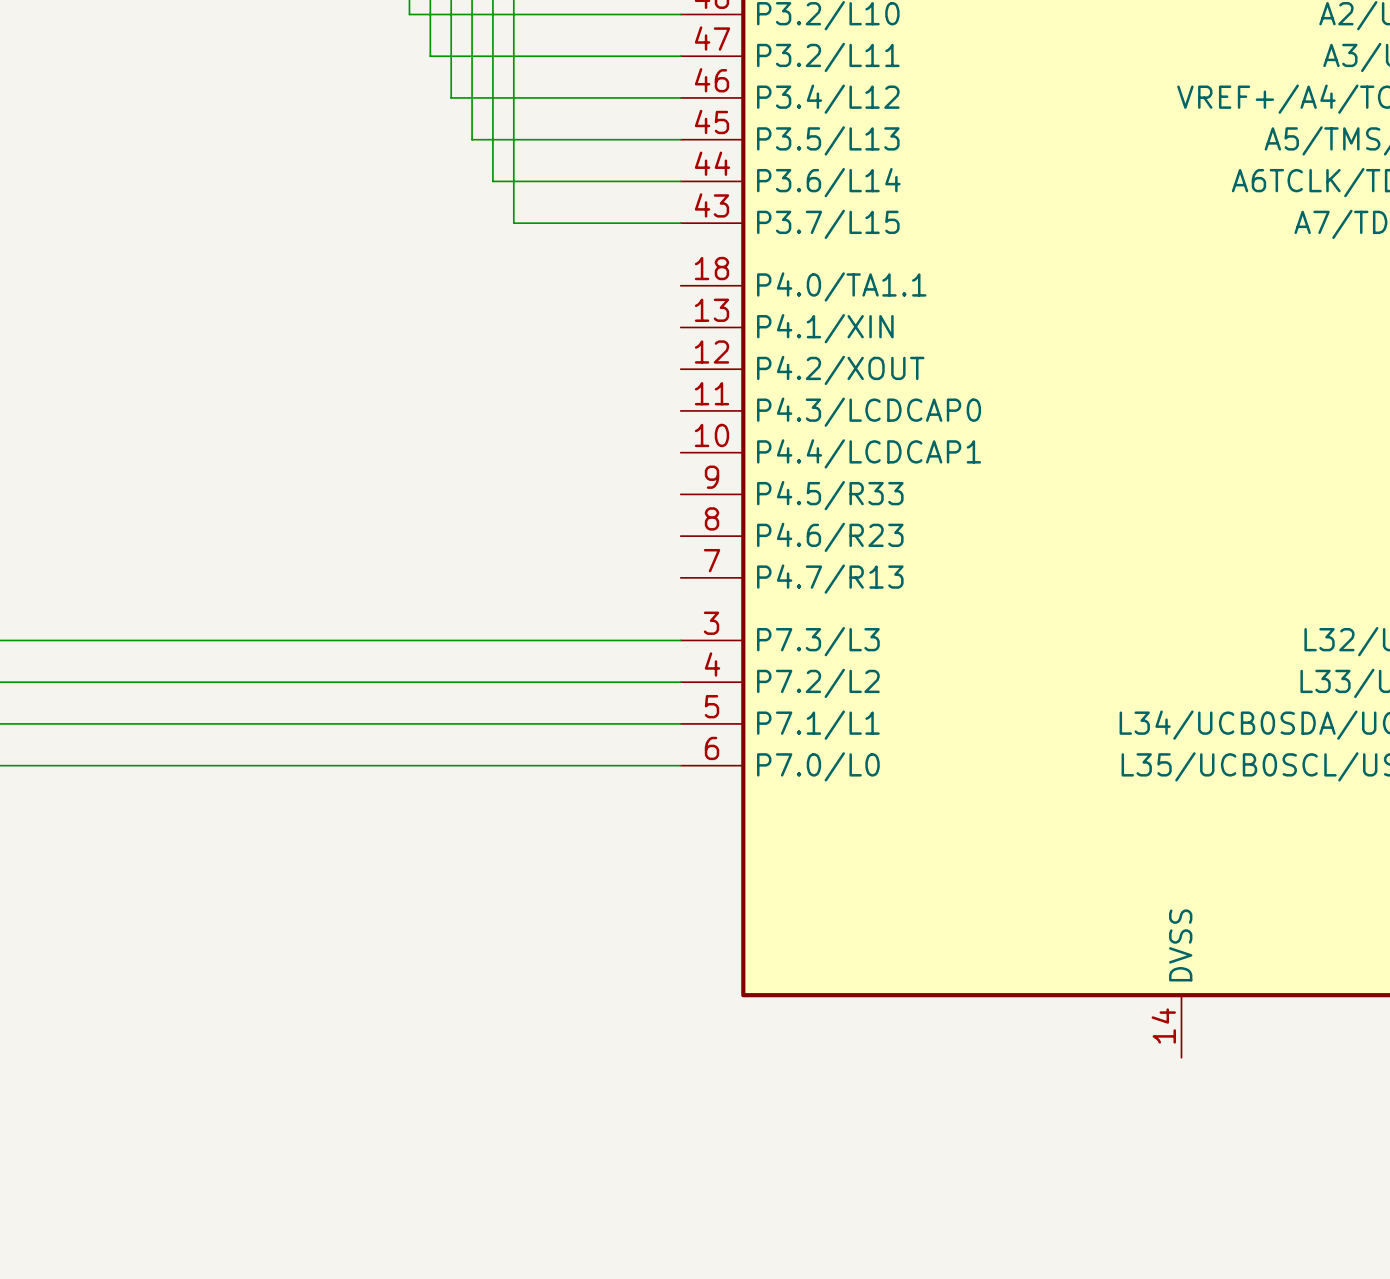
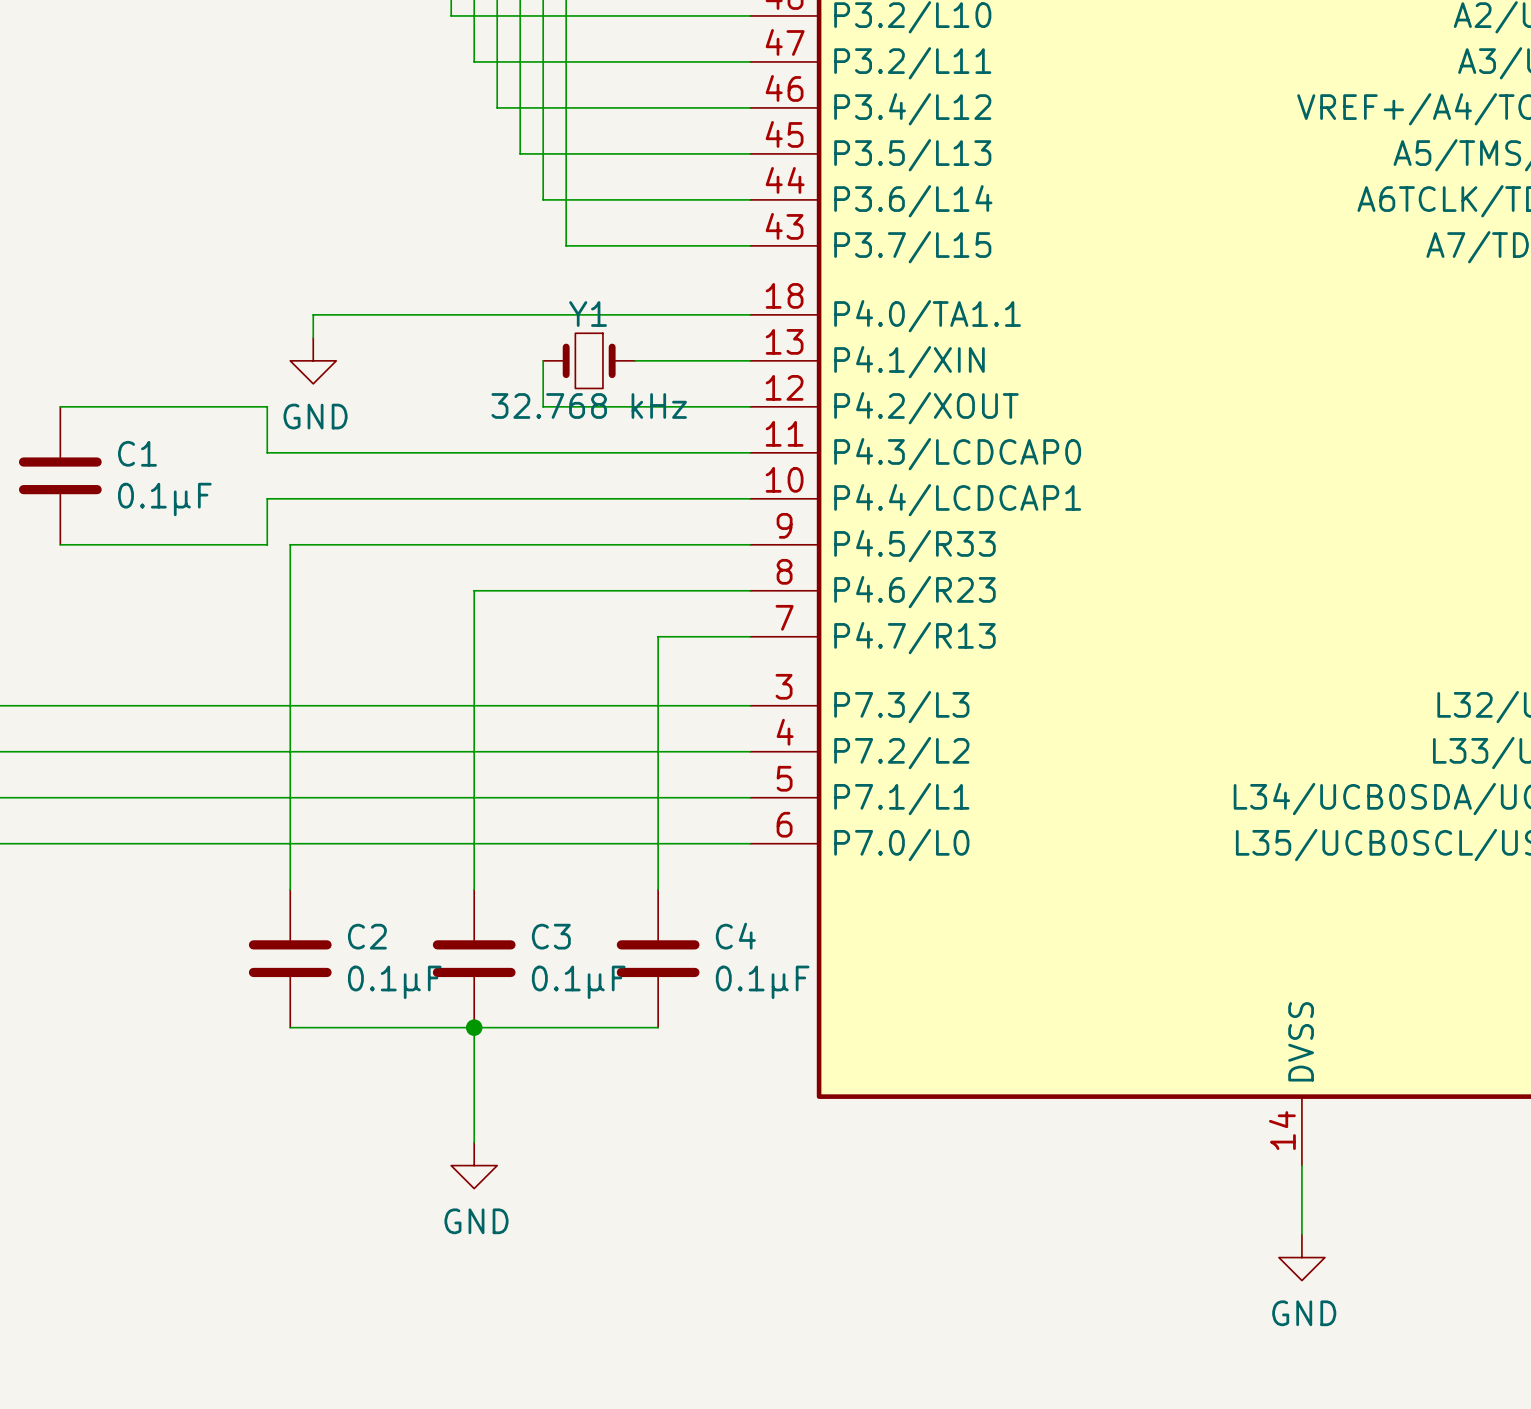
wire: none -> (750, 314) (313, 314) (313, 337)
power symbol: none -> GND (313, 360)
wire: none -> (543, 360) (543, 406) (750, 406)
Y1: none -> 32.768 kHz (589, 360)
wire: none -> (635, 360) (750, 360)
wire: none -> (60, 406) (267, 406) (267, 452) (750, 452)
C1: none -> 0.1µF (60, 475)
wire: none -> (750, 498) (267, 498) (267, 544) (60, 544)
wire: none -> (750, 544) (290, 544) (290, 889)
wire: none -> (750, 590) (474, 590) (474, 889)
wire: none -> (750, 636) (658, 636) (658, 889)
C2: none -> 0.1µF (290, 958)
C3: none -> 0.1µF (474, 958)
C4: none -> 0.1µF (658, 958)
wire: none -> (290, 1027) (658, 1027)
wire: none -> (474, 1027) (474, 1142)
junction: none -> (474, 1027)
power symbol: none -> GND (474, 1165)
wire: none -> (1301, 1165) (1301, 1234)
power symbol: none -> GND (1301, 1257)

